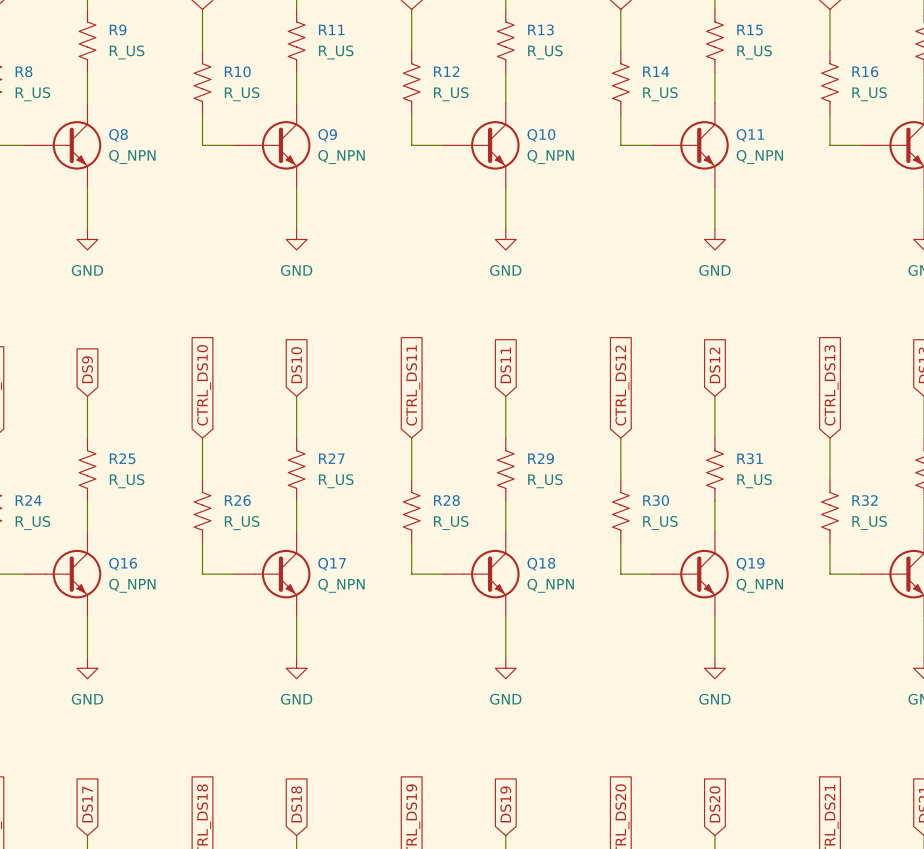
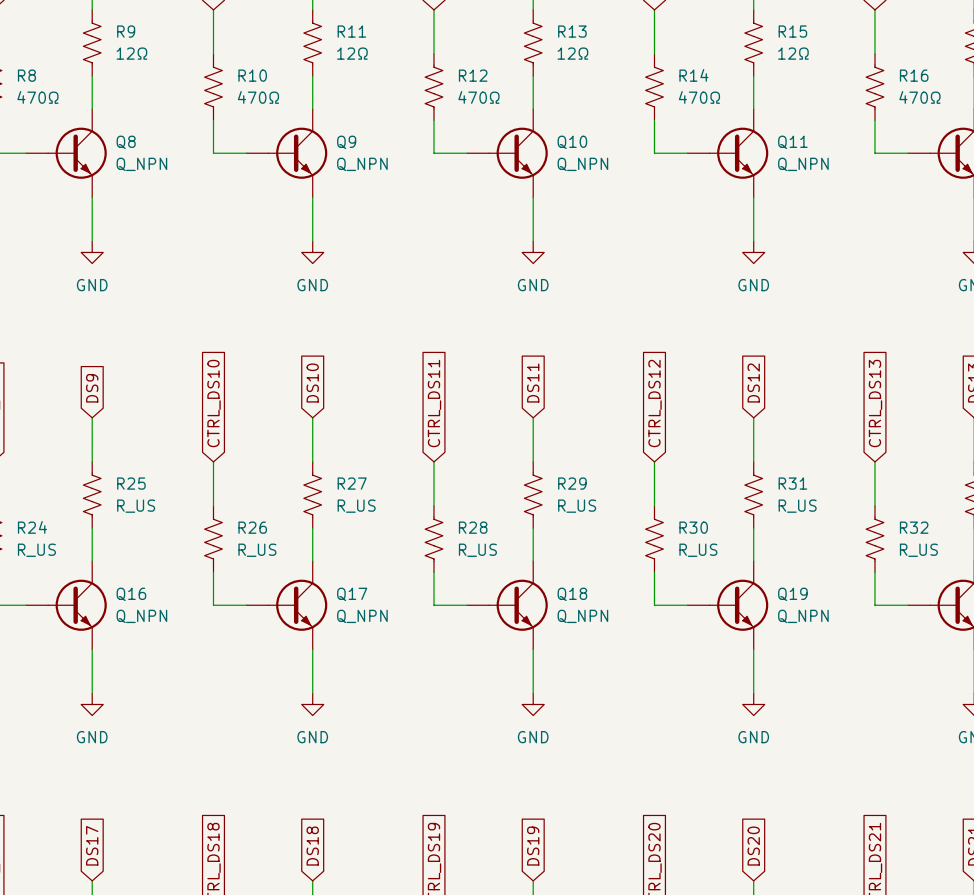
R9 value: R_US (127, 52) -> 12Ω (131, 53)
R11 value: R_US (336, 52) -> 12Ω (352, 53)
R13 value: R_US (545, 52) -> 12Ω (572, 53)
R15 value: R_US (754, 52) -> 12Ω (793, 53)
R8 value: R_US (32, 94) -> 470Ω (37, 97)
R10 value: R_US (242, 94) -> 470Ω (258, 97)
R12 value: R_US (451, 94) -> 470Ω (478, 97)
R14 value: R_US (660, 94) -> 470Ω (699, 97)
R16 value: R_US (869, 94) -> 470Ω (919, 97)

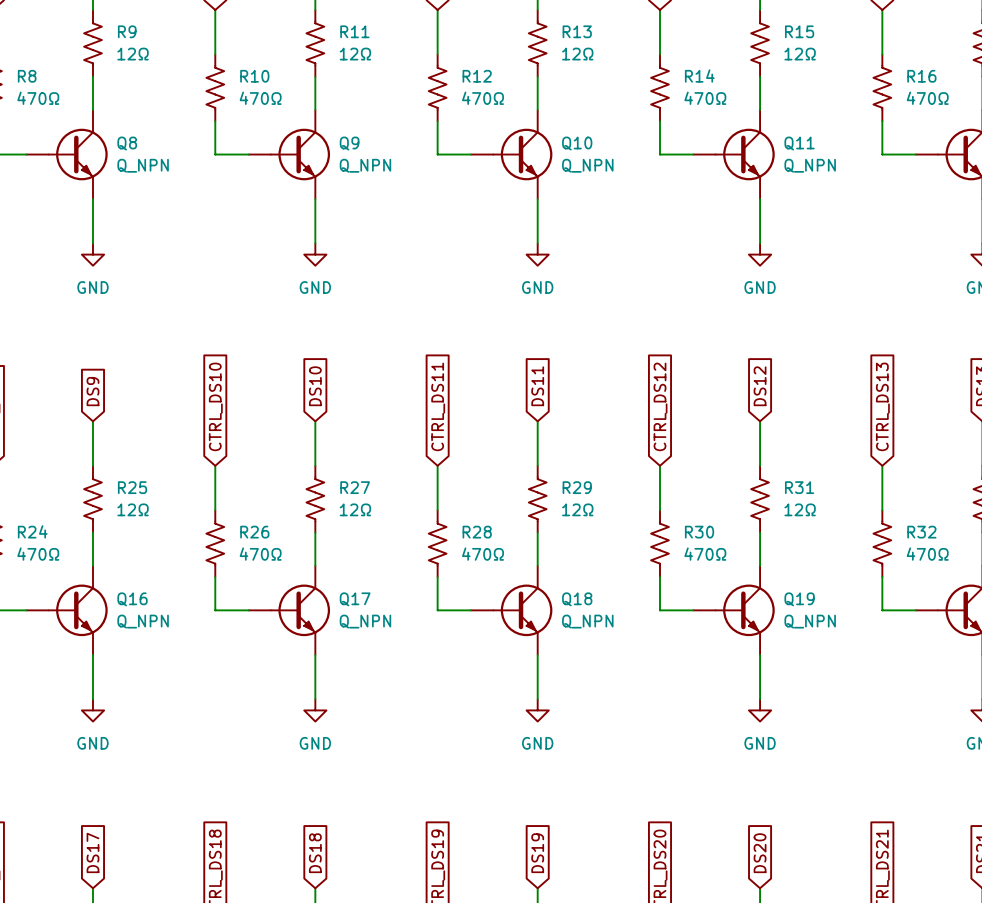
R25 value: R_US (136, 506) -> 12Ω (133, 509)
R27 value: R_US (356, 506) -> 12Ω (355, 509)
R29 value: R_US (577, 506) -> 12Ω (577, 509)
R31 value: R_US (797, 506) -> 12Ω (800, 509)
R24 value: R_US (36, 550) -> 470Ω (38, 554)
R26 value: R_US (257, 550) -> 470Ω (260, 554)
R28 value: R_US (477, 550) -> 470Ω (482, 554)
R30 value: R_US (698, 550) -> 470Ω (705, 554)
R32 value: R_US (918, 550) -> 470Ω (927, 554)

